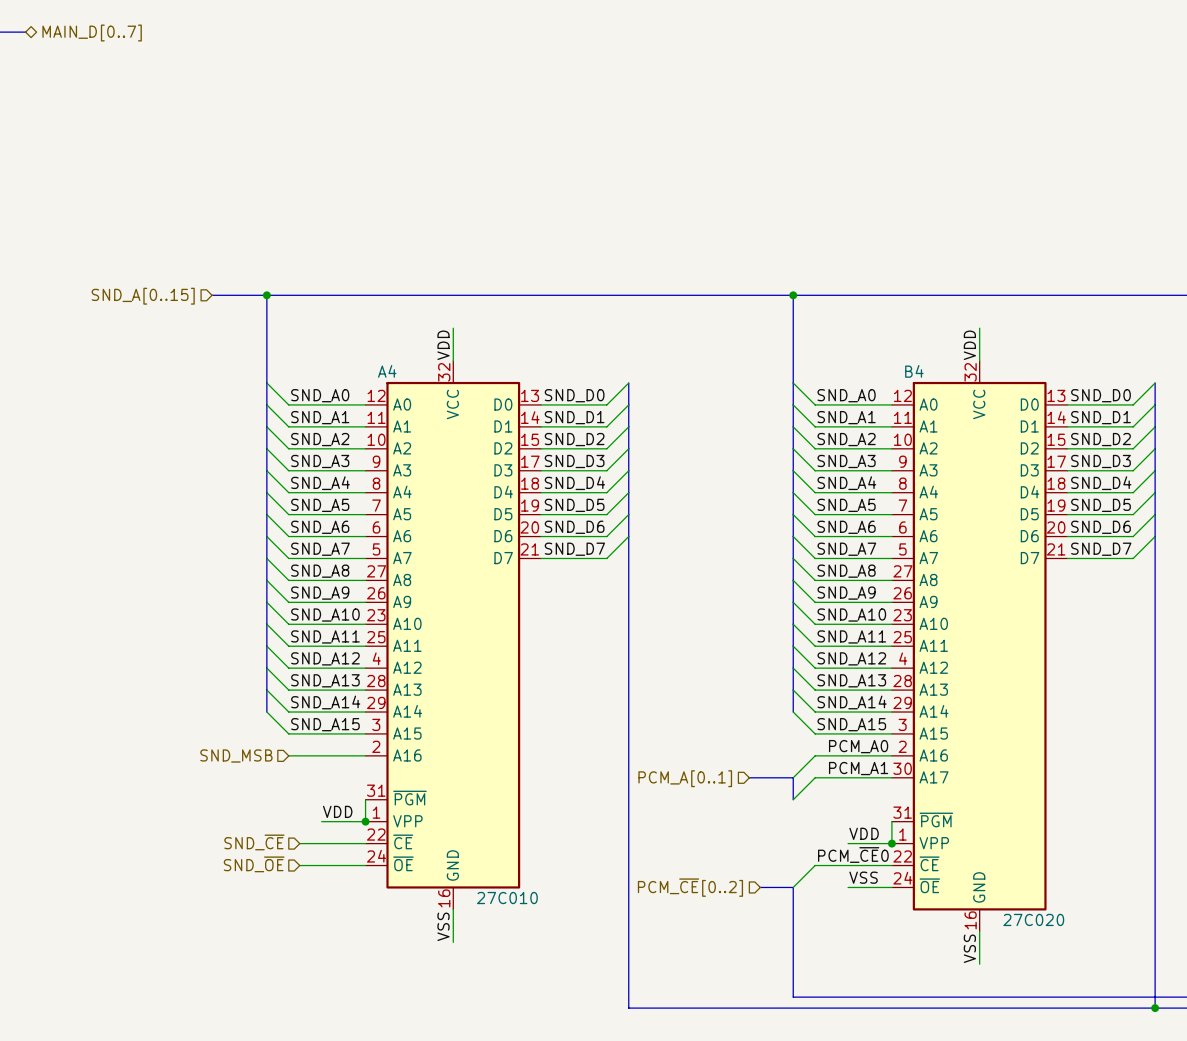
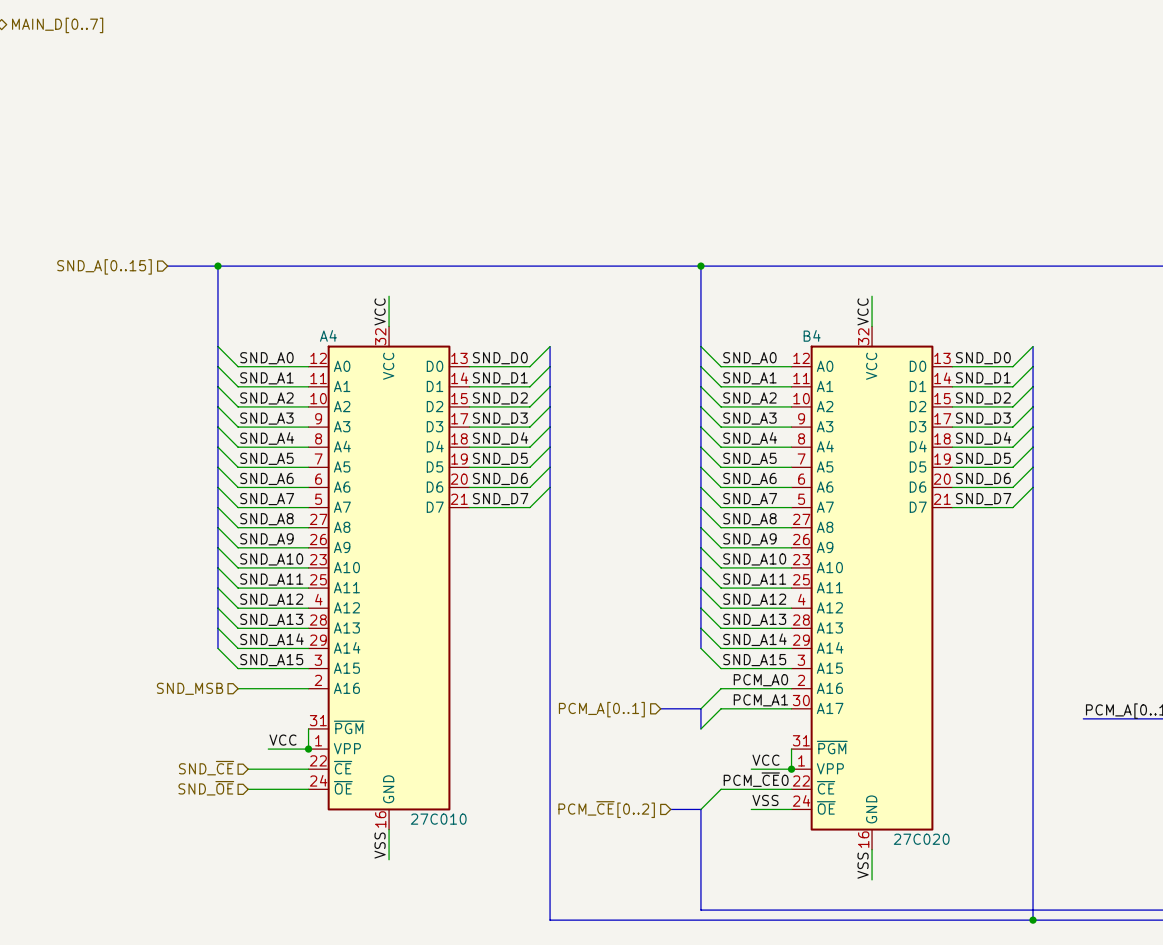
label: VDD (443, 345) -> VCC (380, 311)
label: VDD (969, 345) -> VCC (863, 311)
label: VDD (337, 811) -> VCC (282, 740)
label: VDD (864, 833) -> VCC (765, 760)

